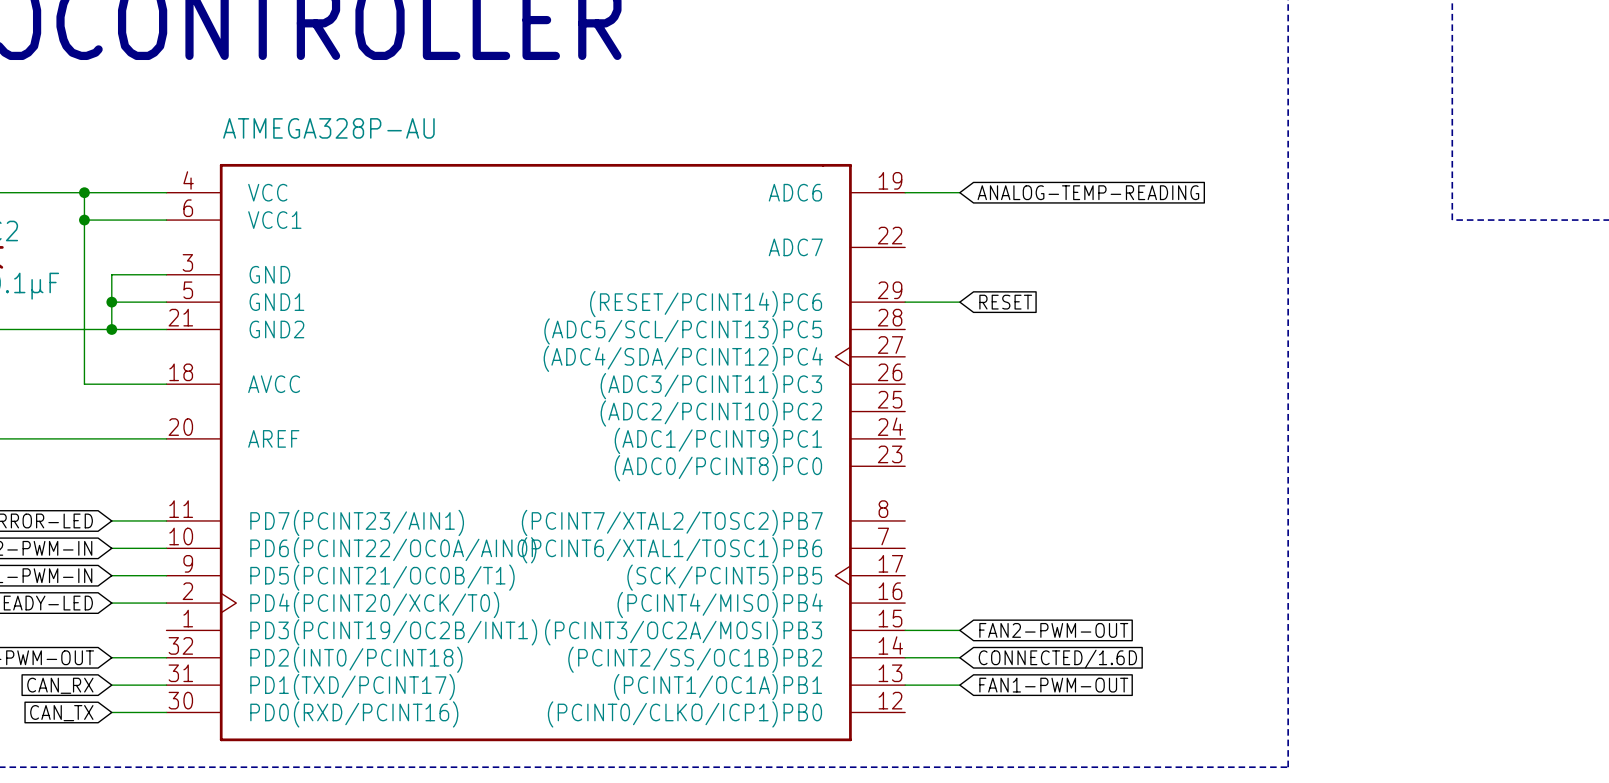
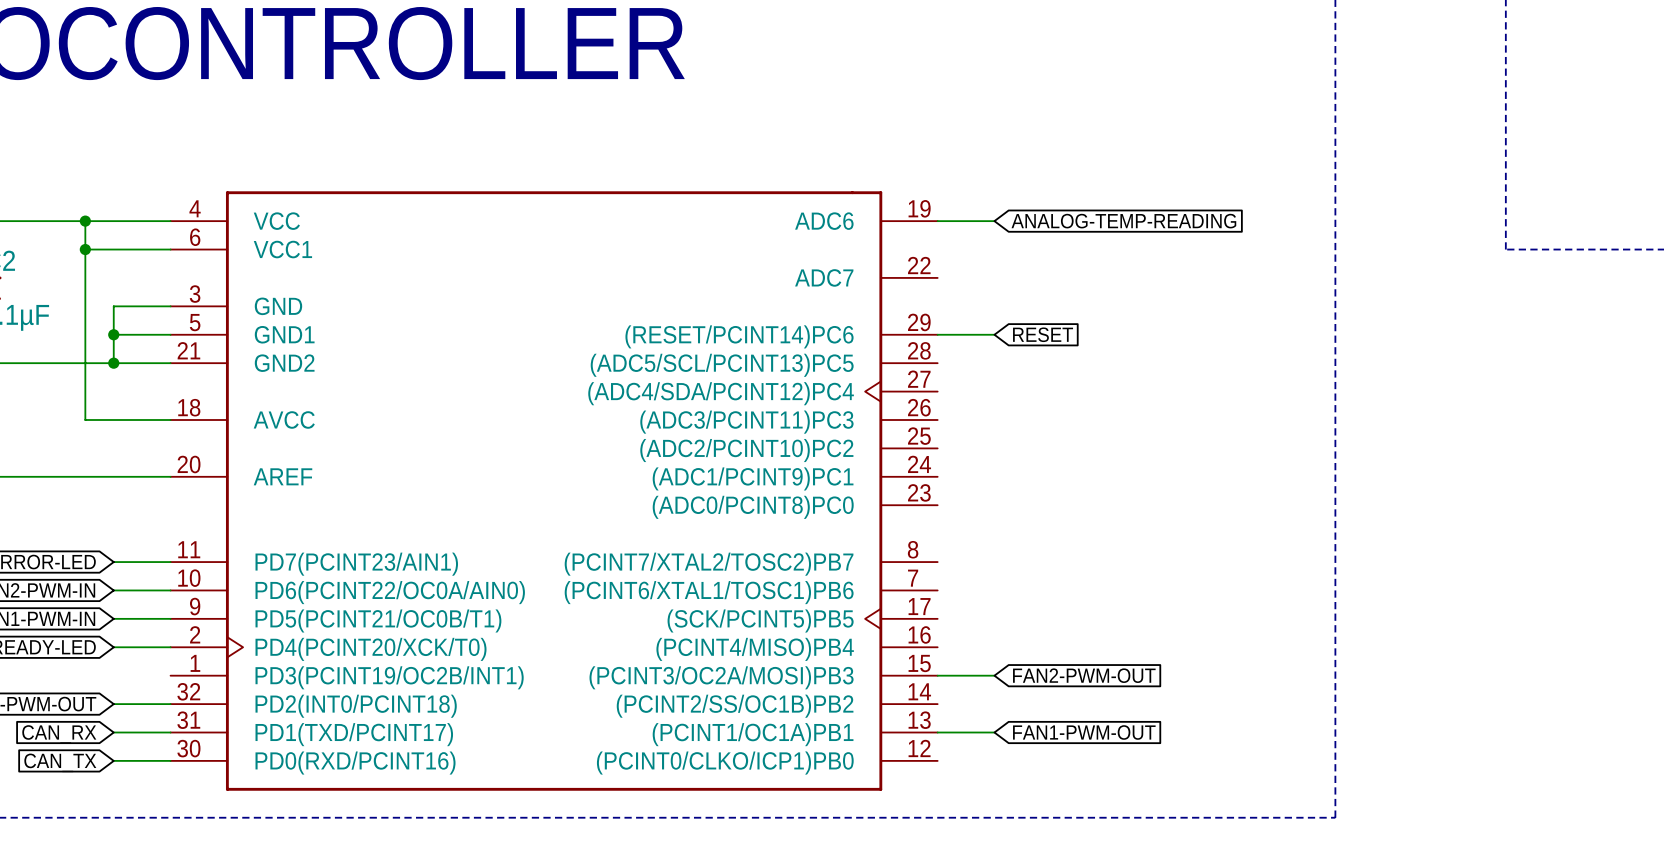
part text: ATMEGA328P-AU (328, 128) -> none
wire: (905, 657) (959, 657) -> none
global label: CONNECTED/1.6D (1057, 659) -> none

